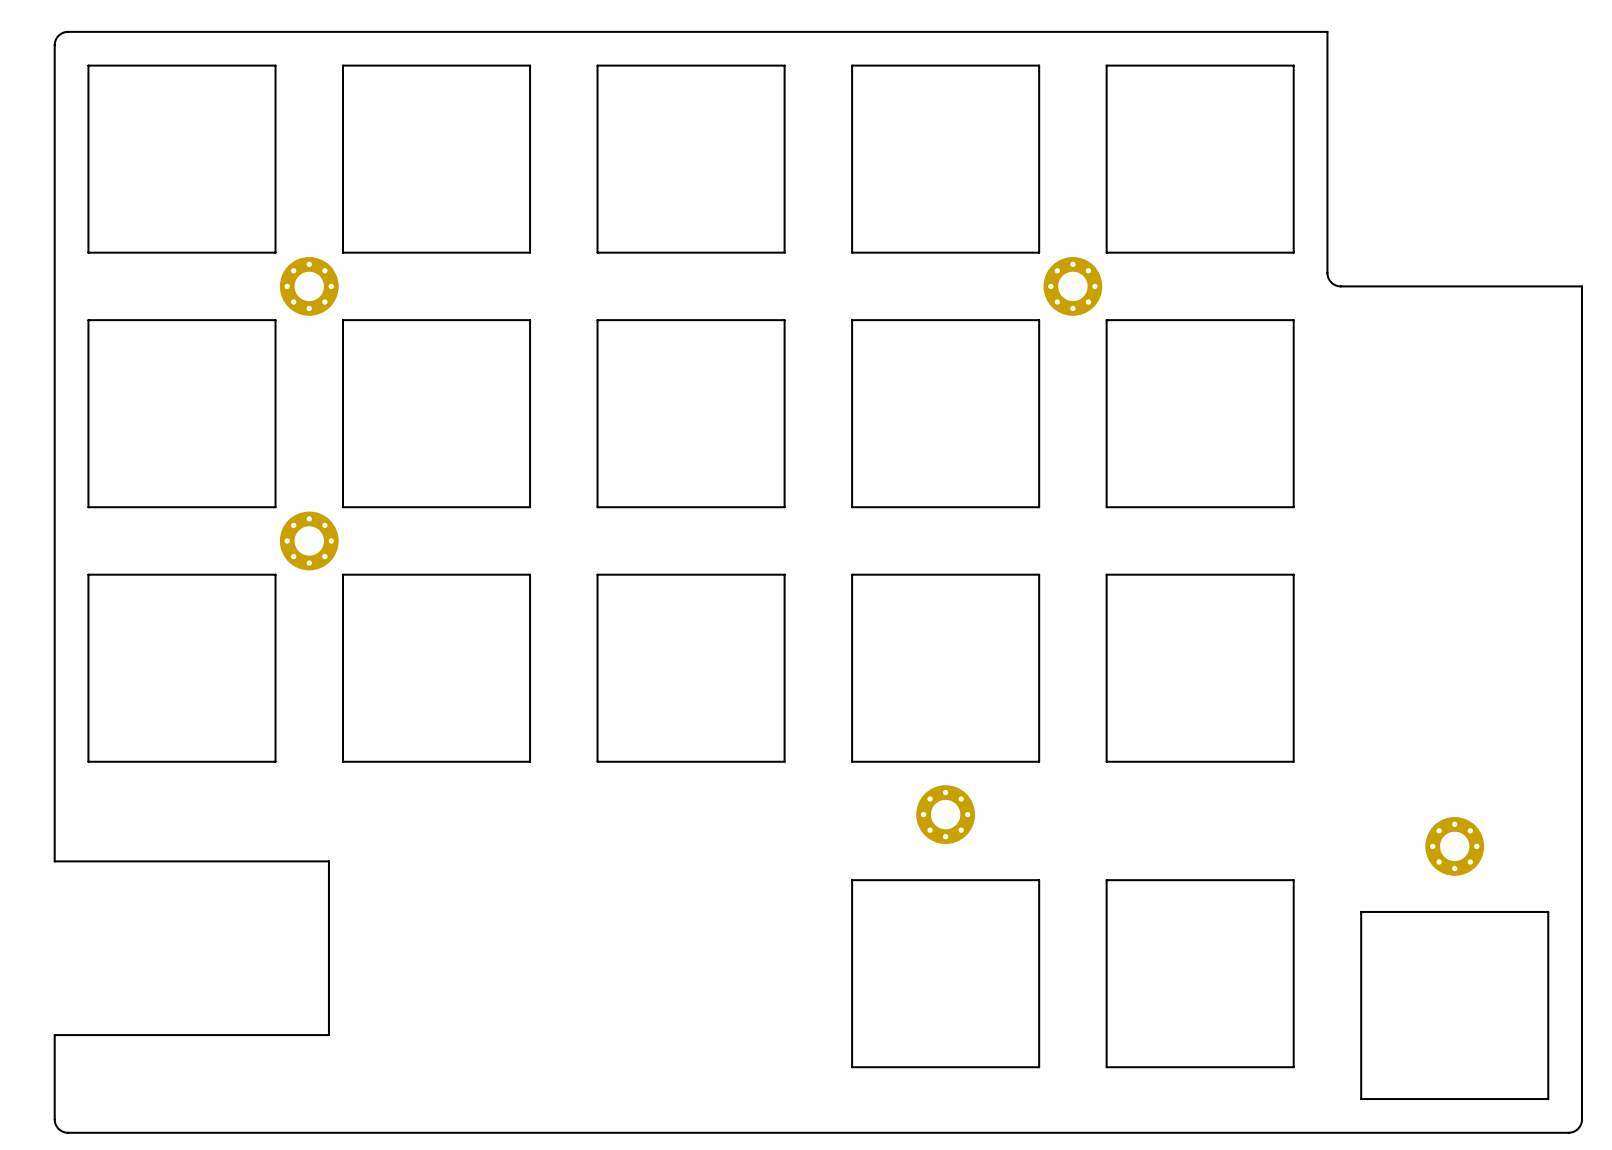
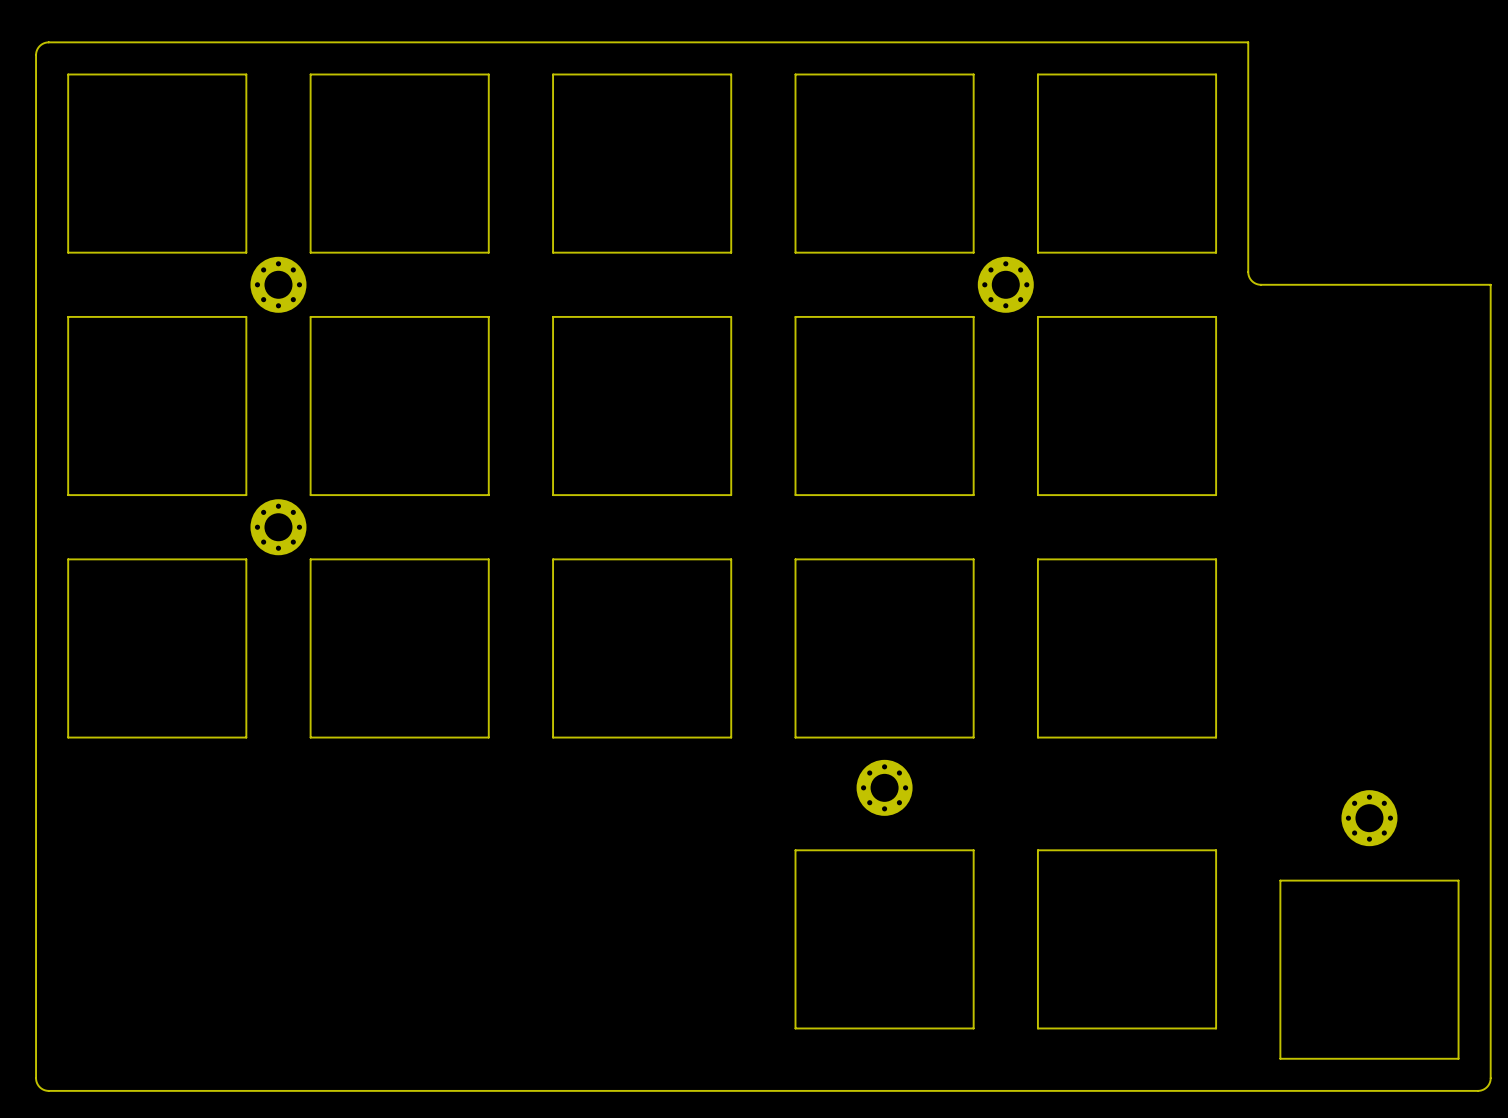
board edge: (54, 861) (328, 861) (328, 1035) (54, 1035) -> (36, 832) (36, 997)

